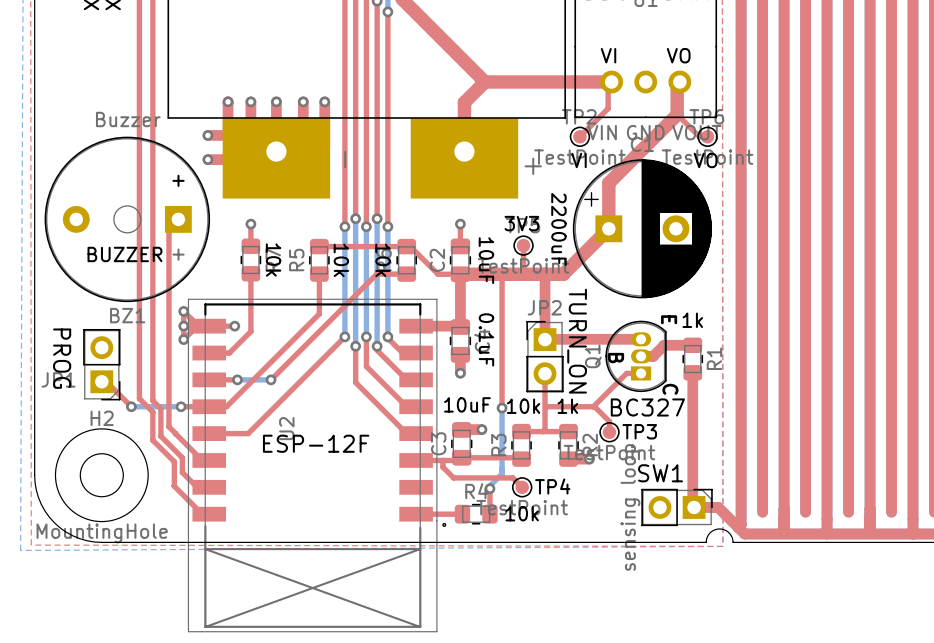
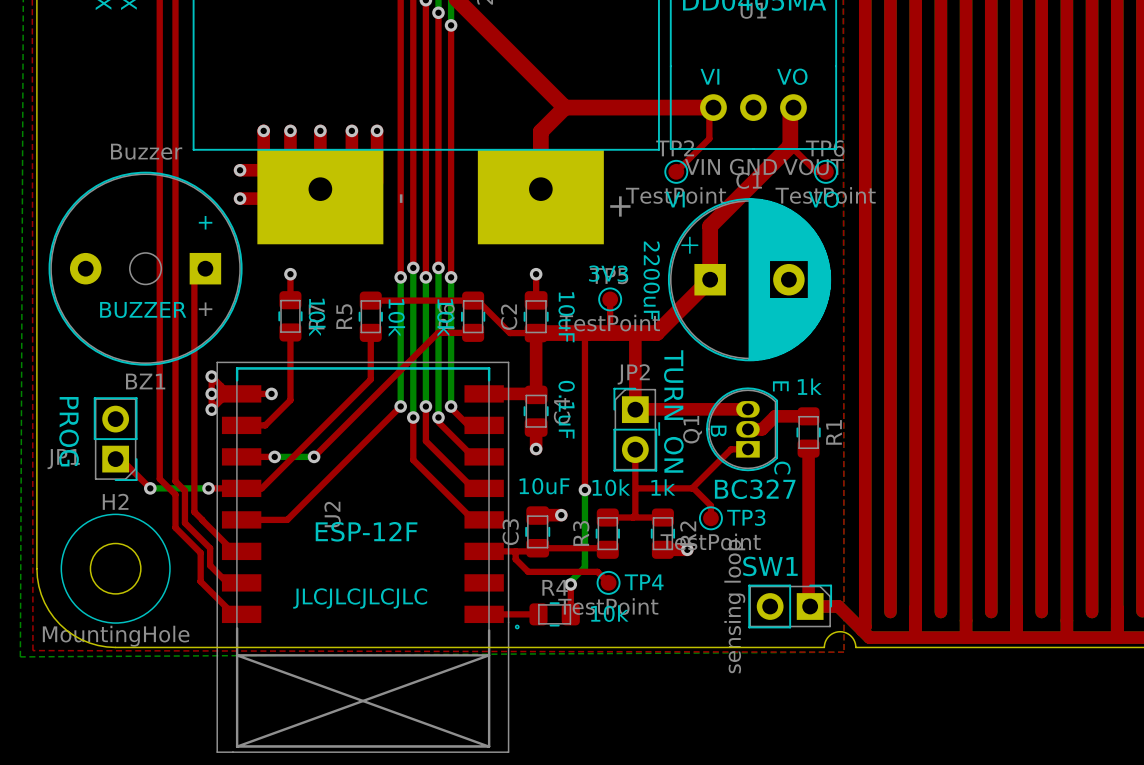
text: none -> JLCJLCJLCJLC (360, 598)

